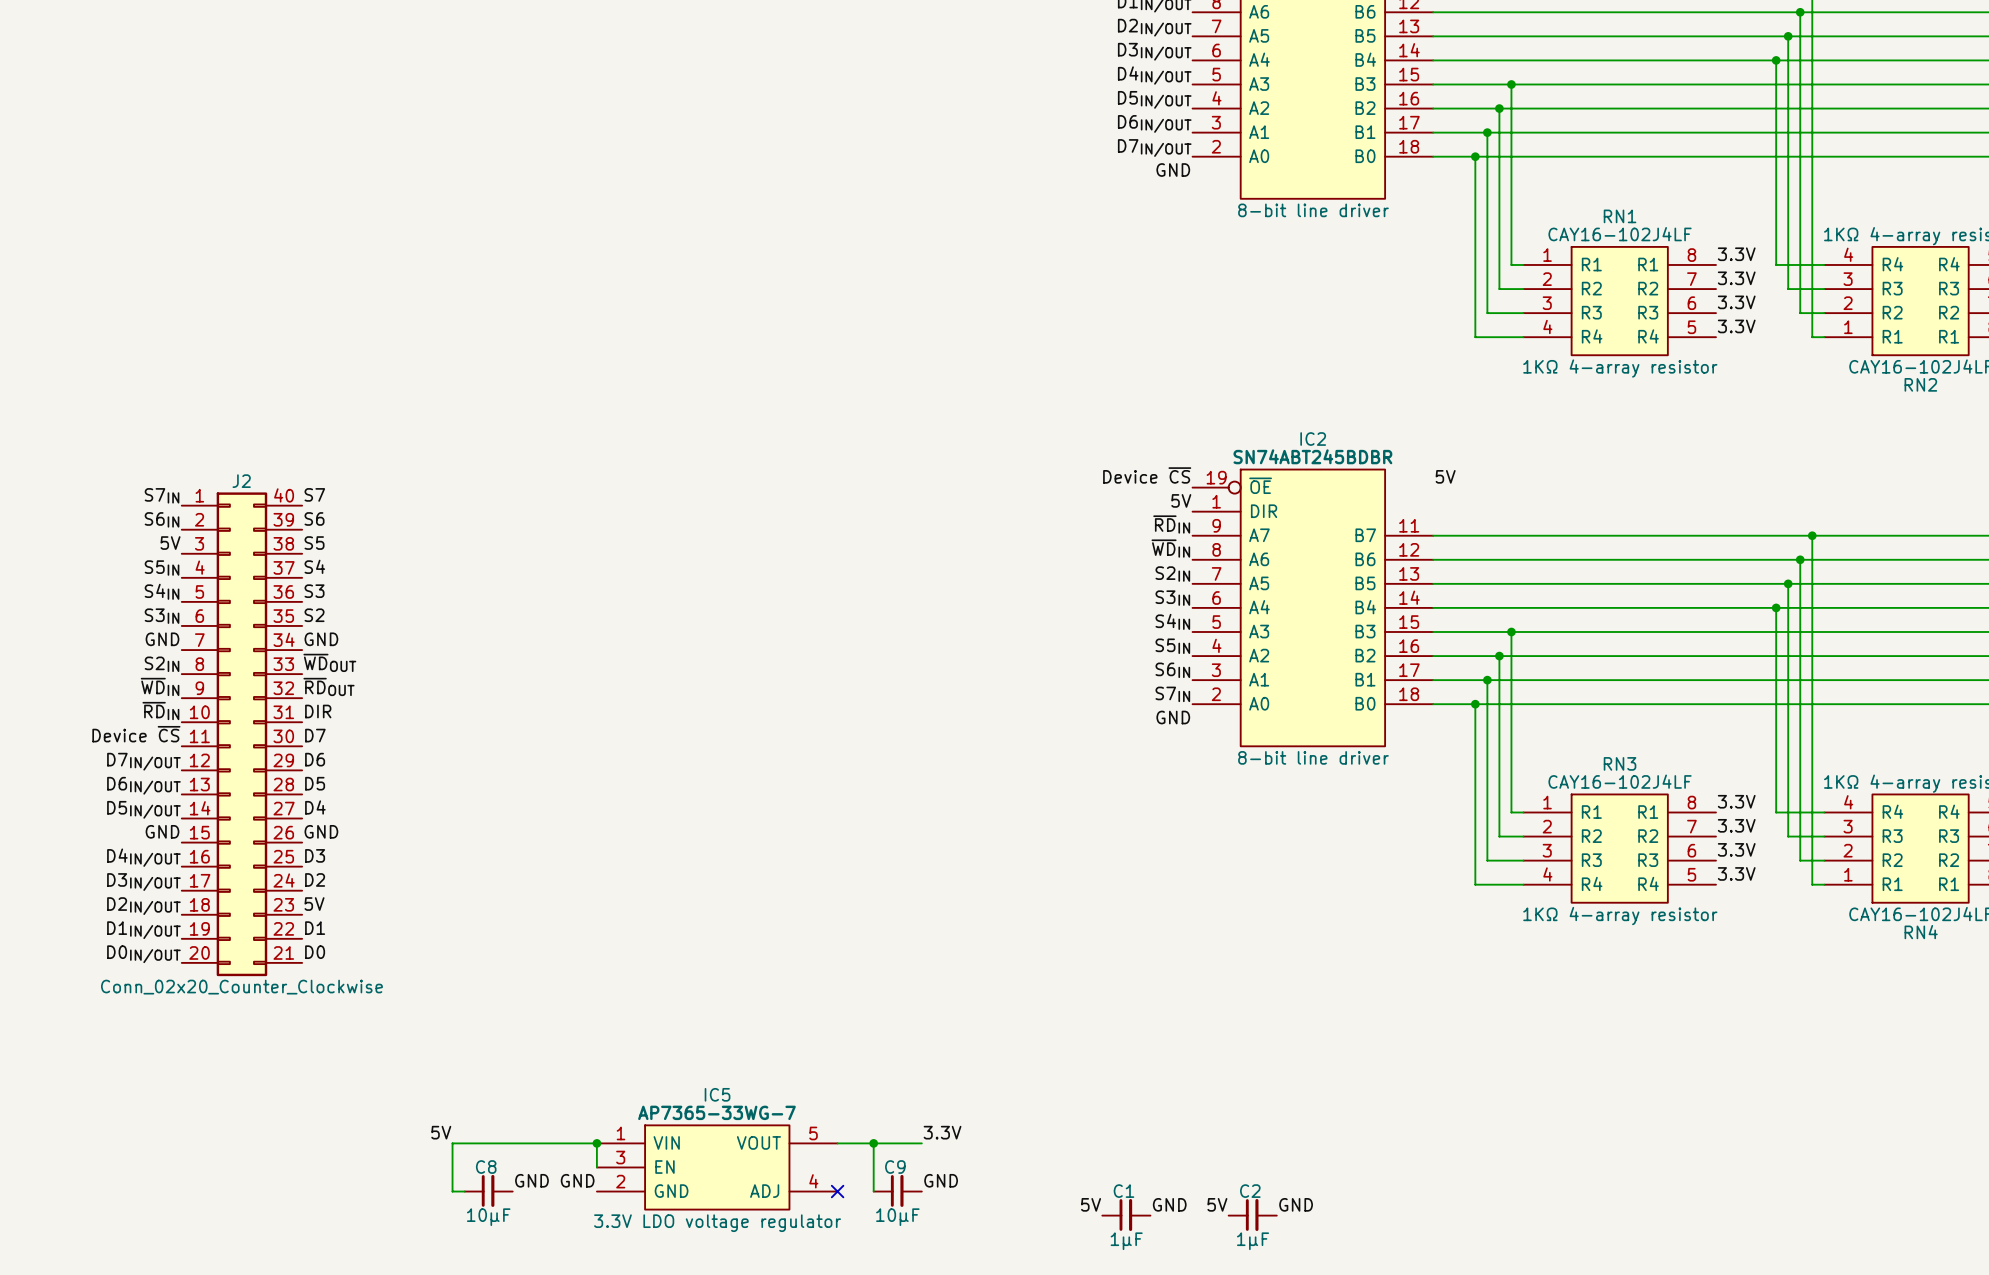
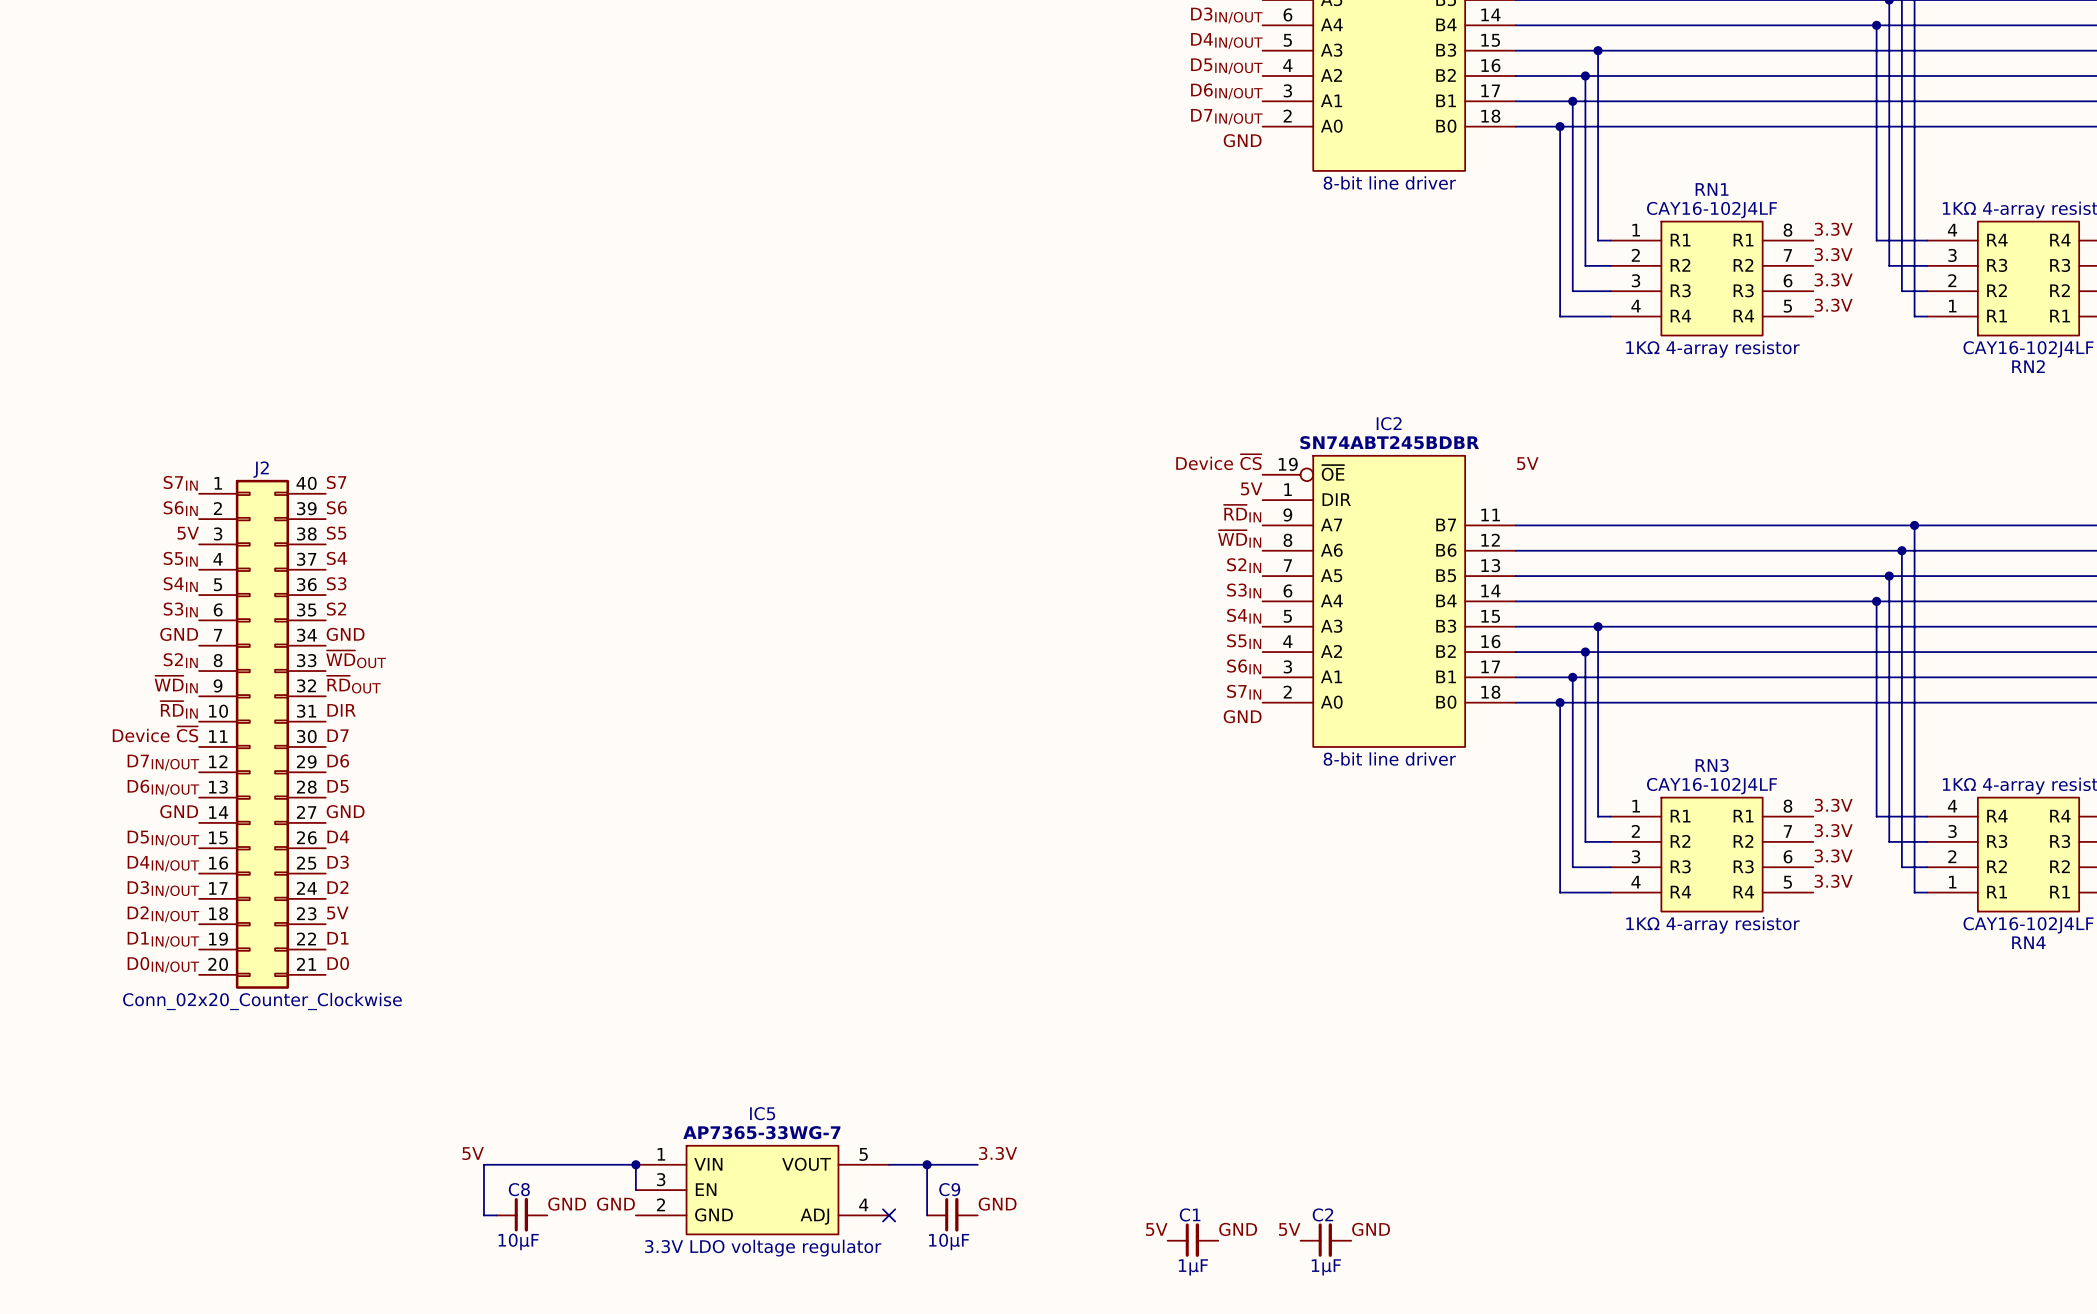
label: D4 (315, 807) -> GND (345, 811)
label: D5IN/OUT (143, 809) -> GND (179, 811)
label: GND (162, 831) -> D5IN/OUT (163, 838)
label: GND (321, 831) -> D4 (338, 836)

